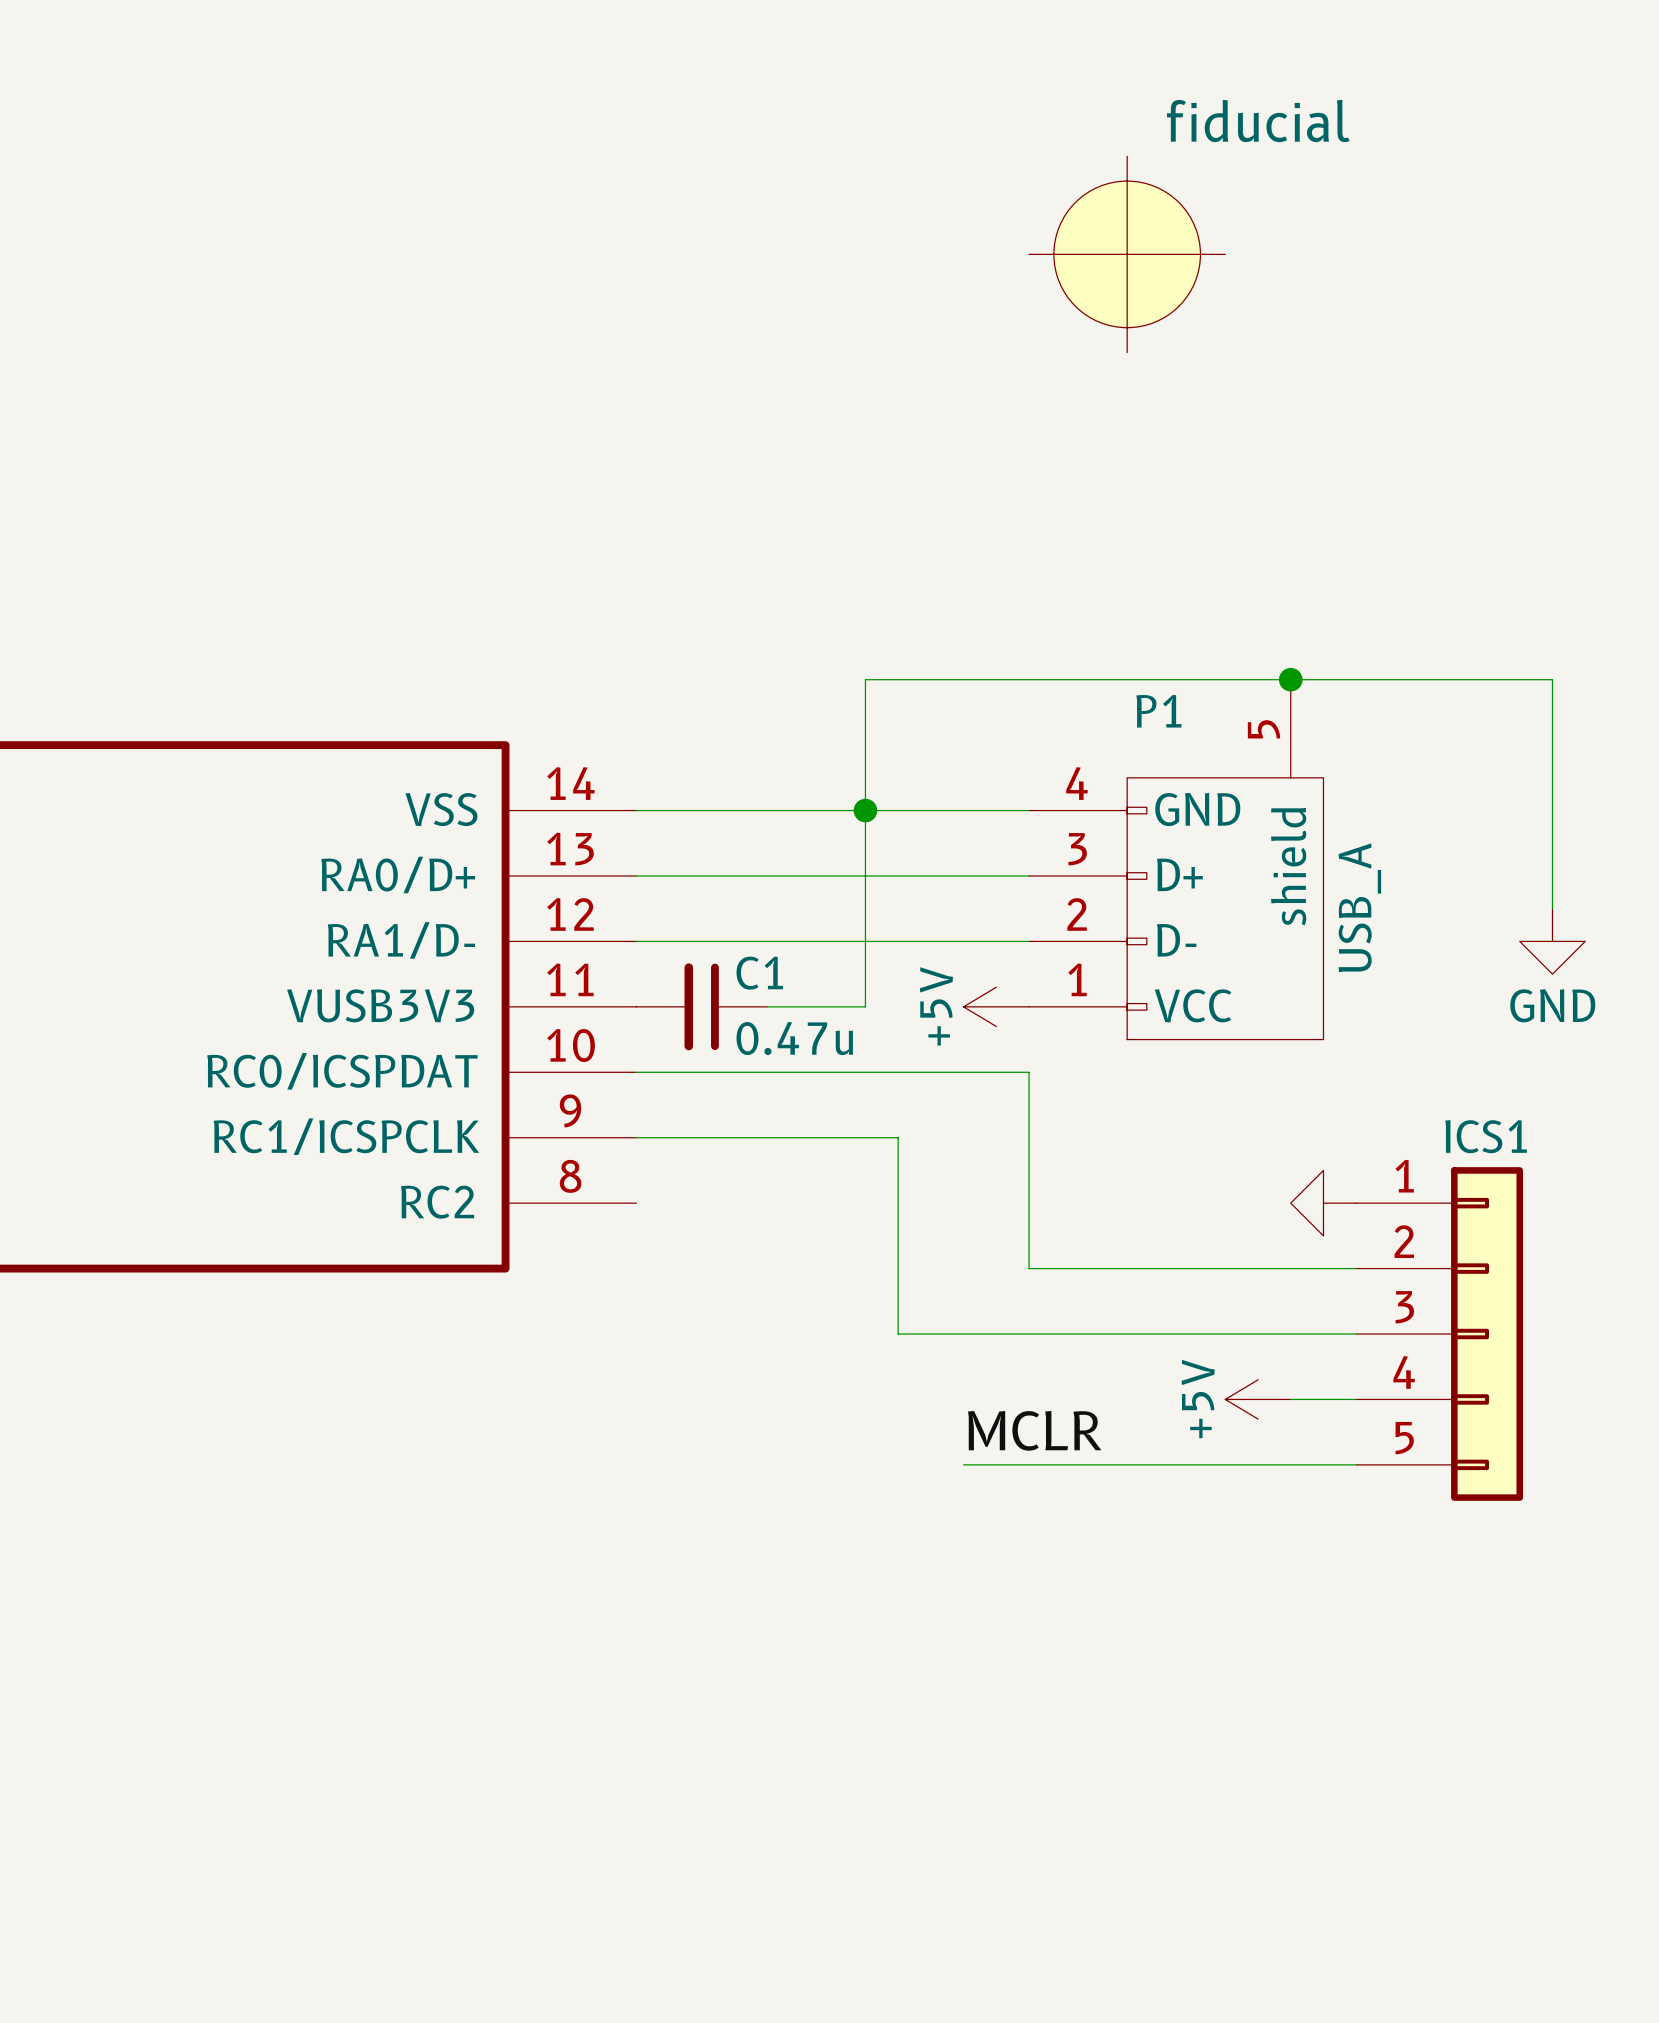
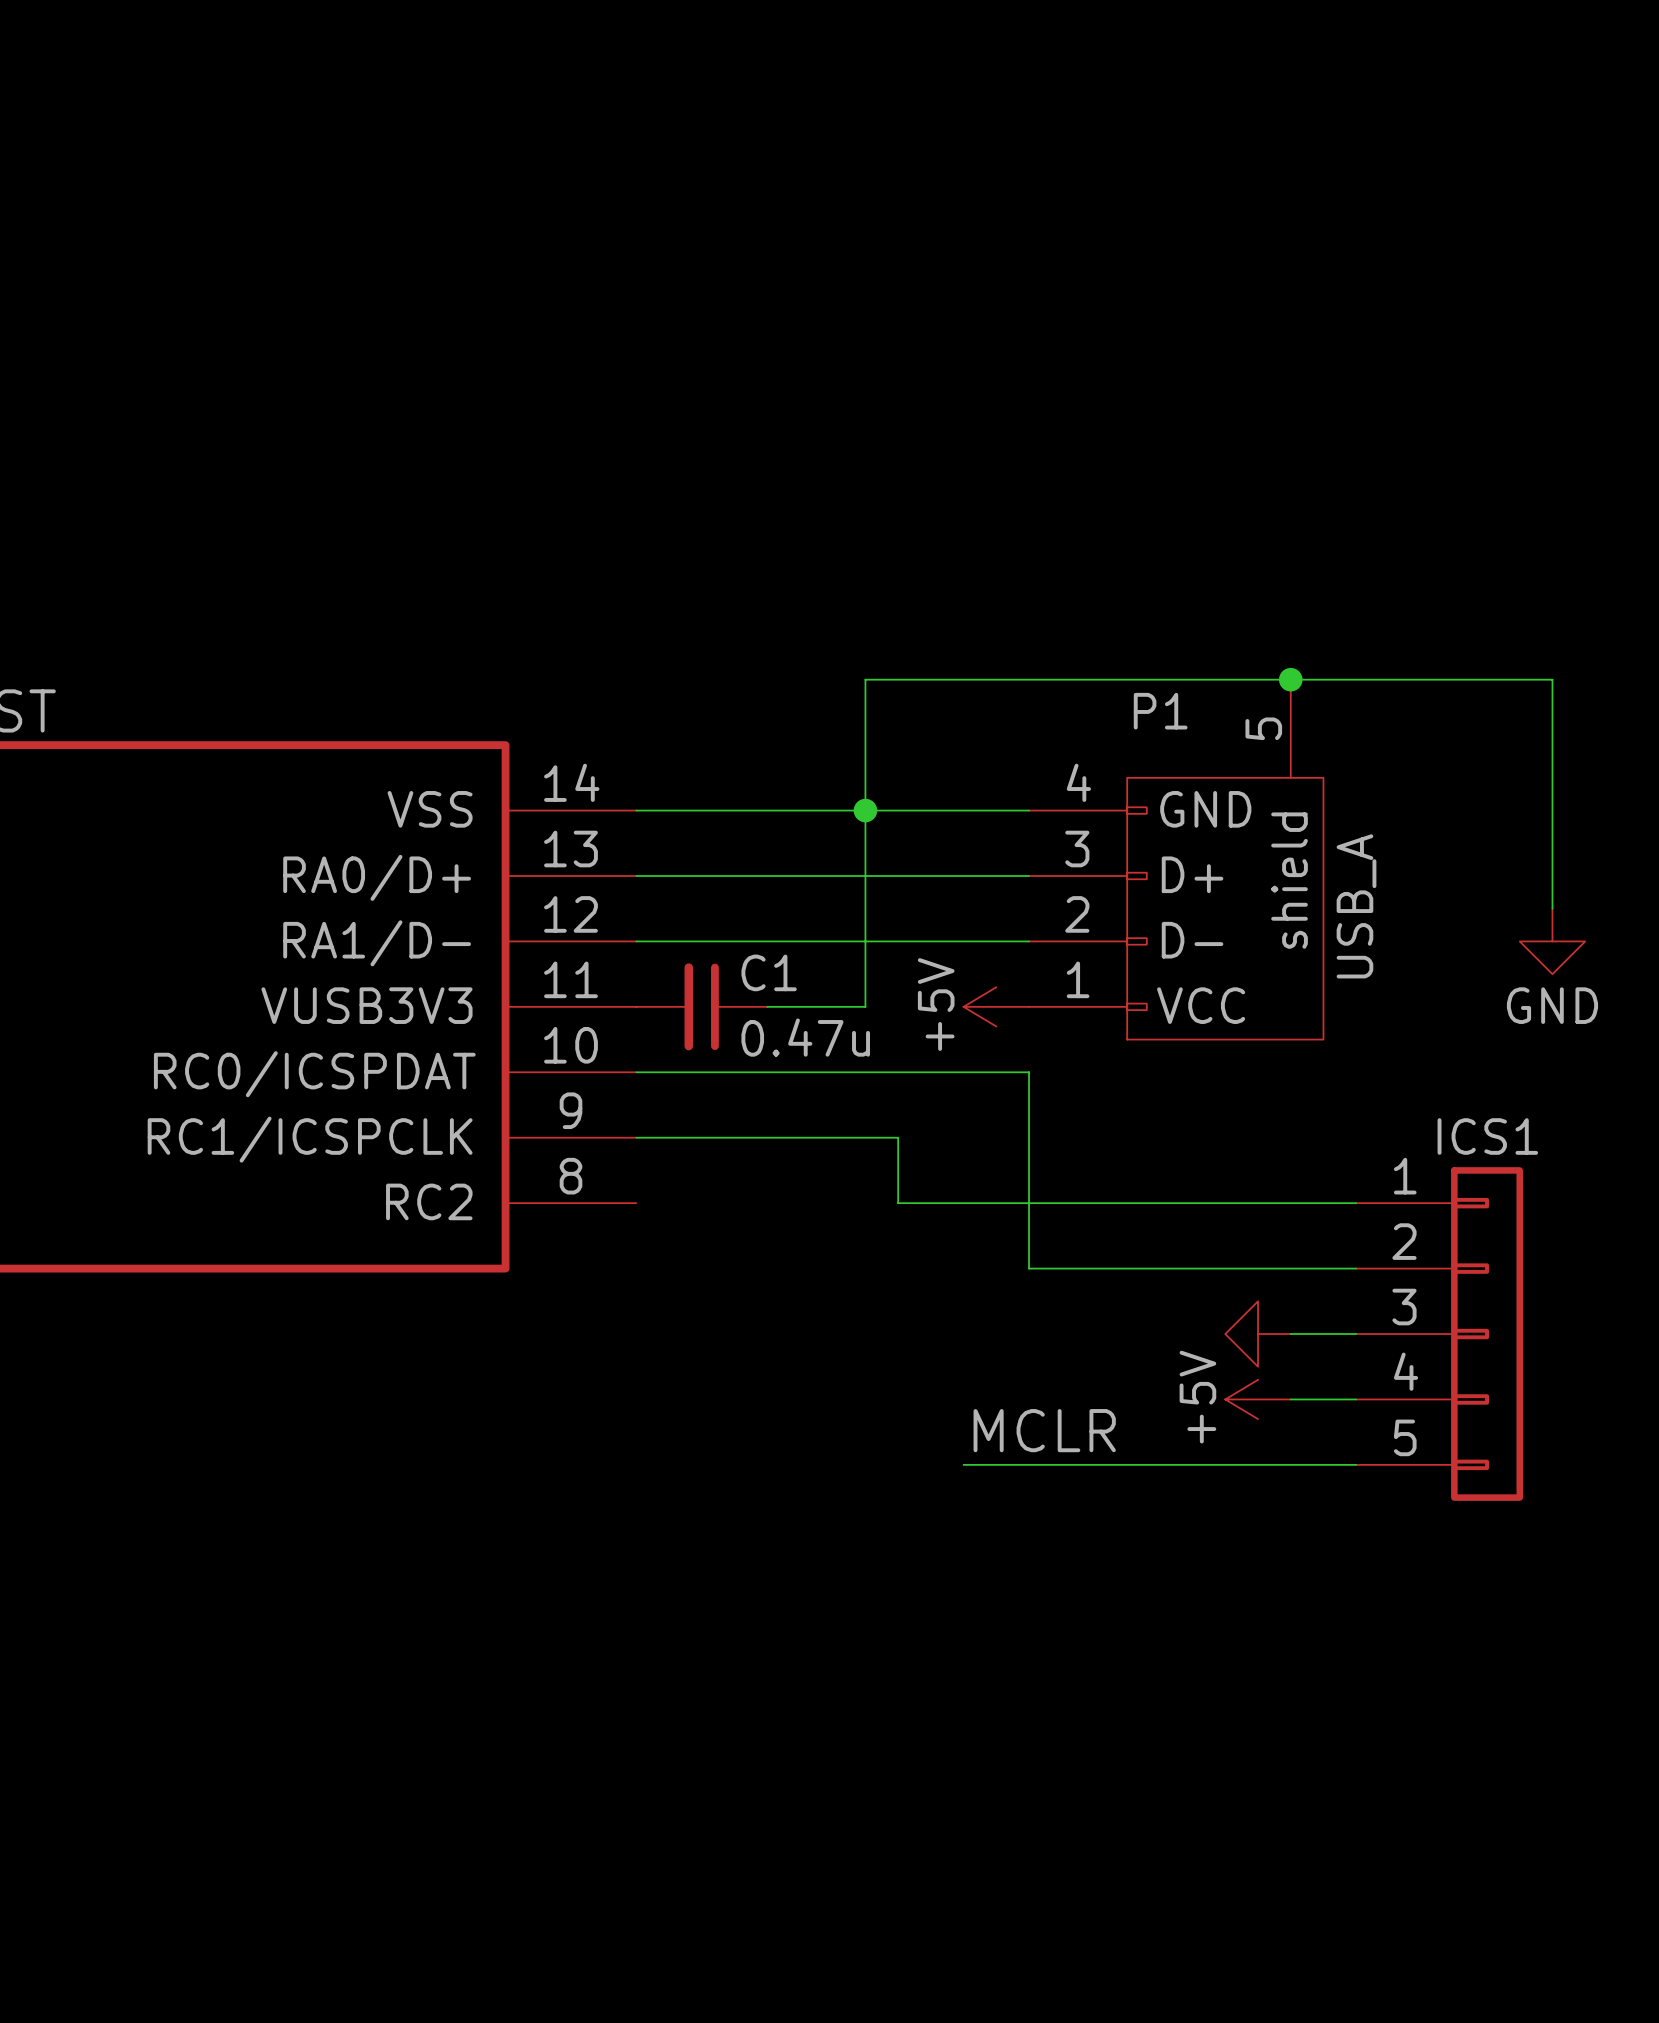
part: fiducial (1127, 254) -> none
wire: (898, 1203) (898, 1334) (1290, 1334) -> (898, 1203) (1356, 1203)
power symbol position: (1323, 1203) -> (1258, 1334)

